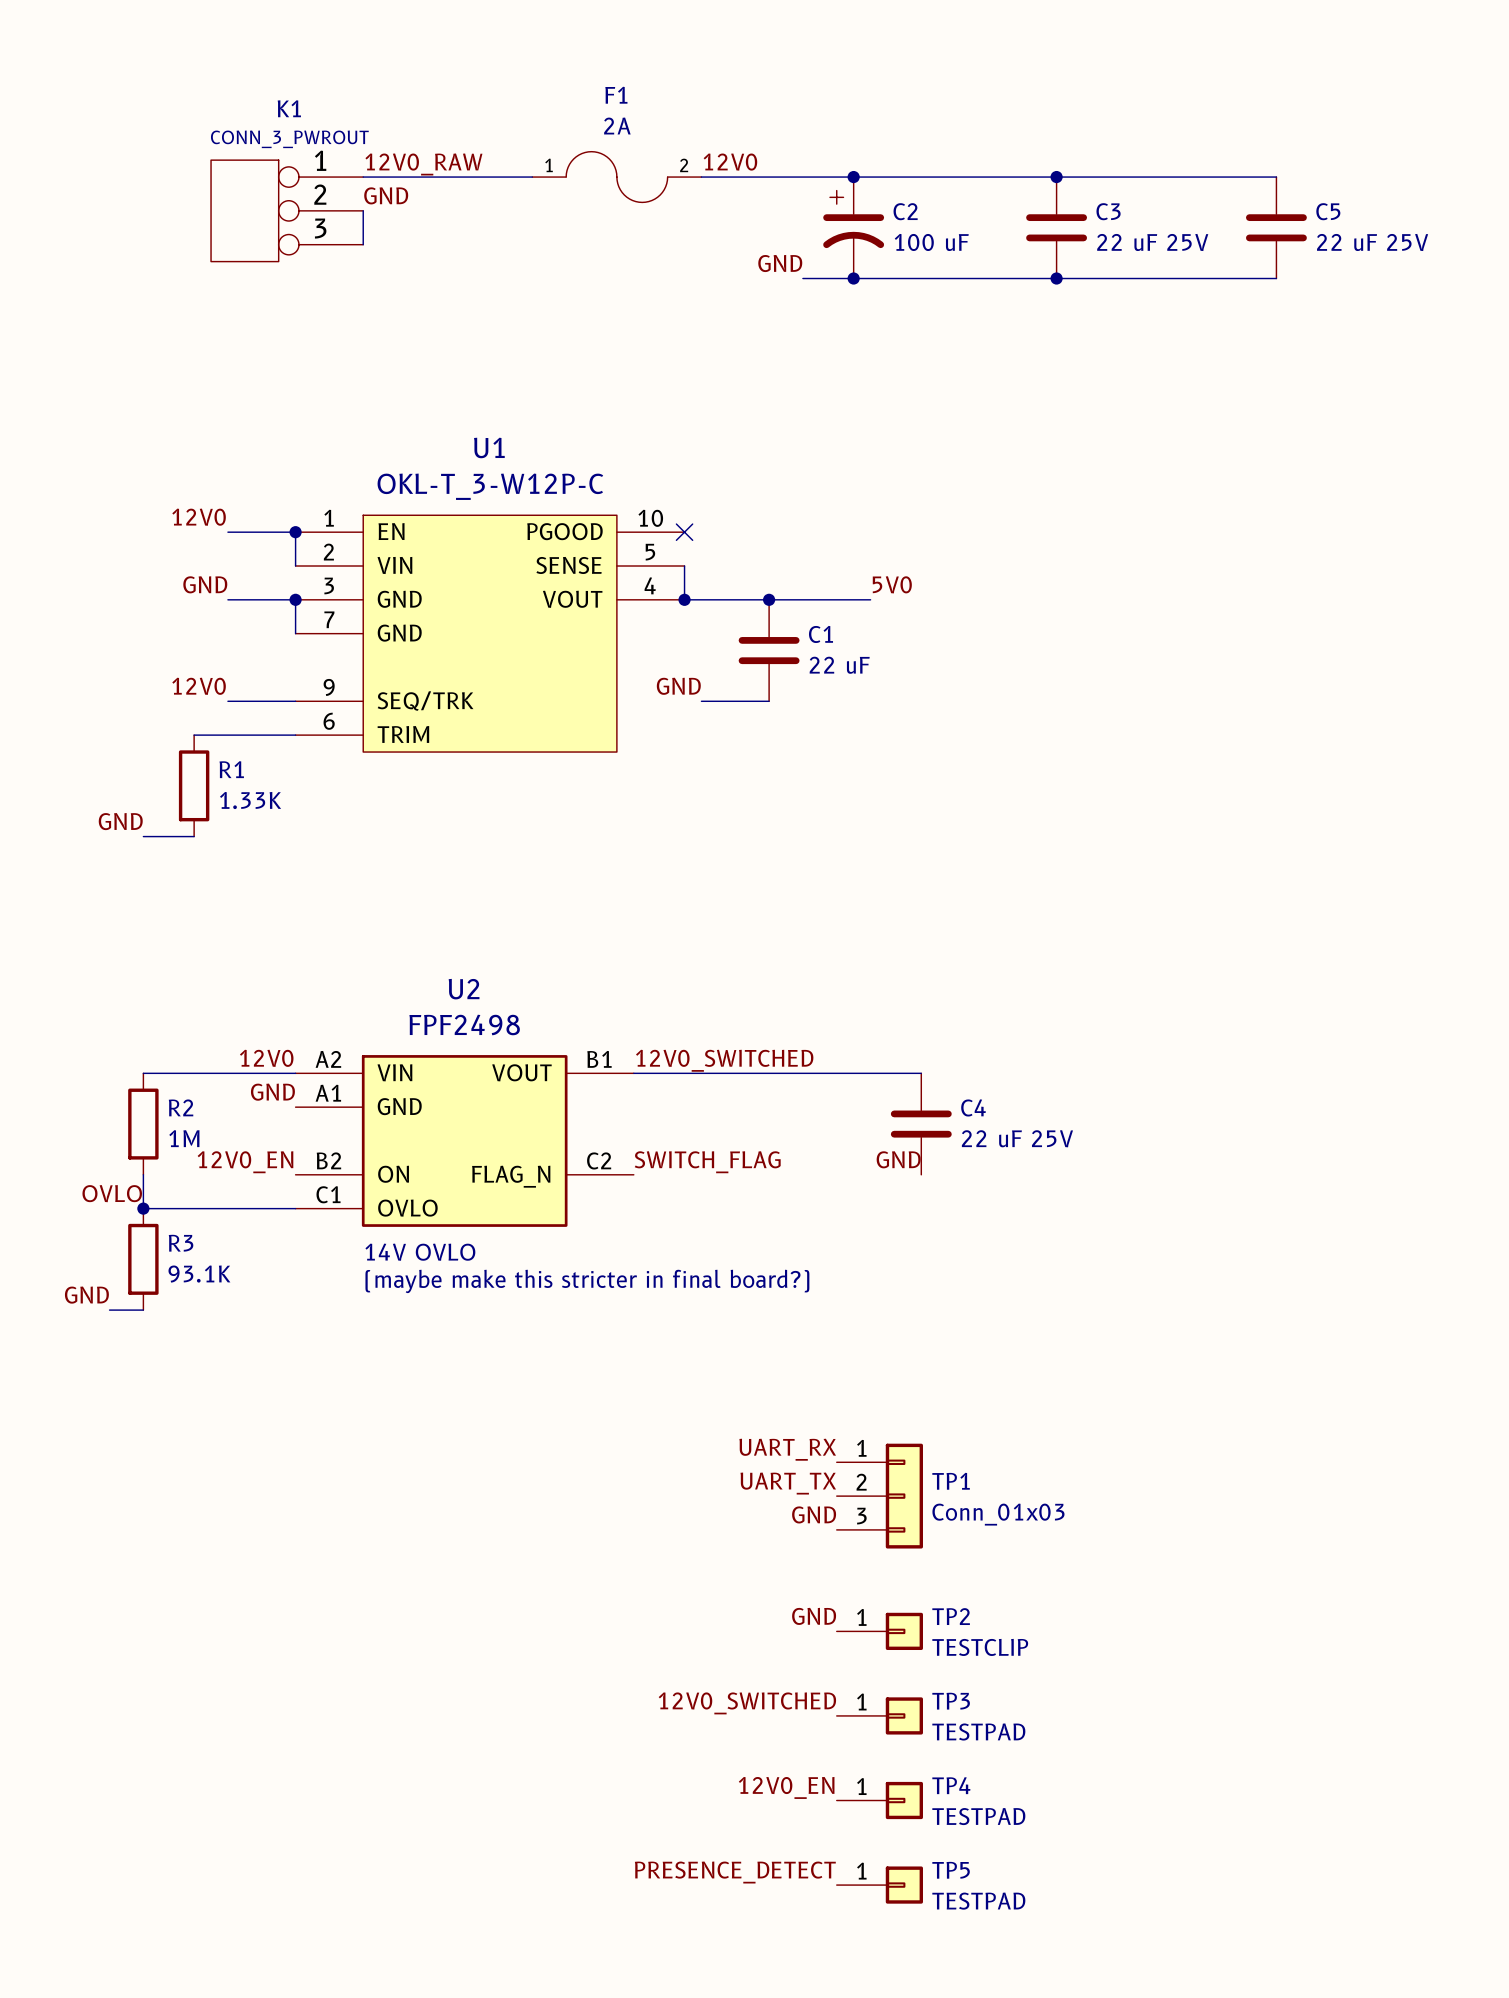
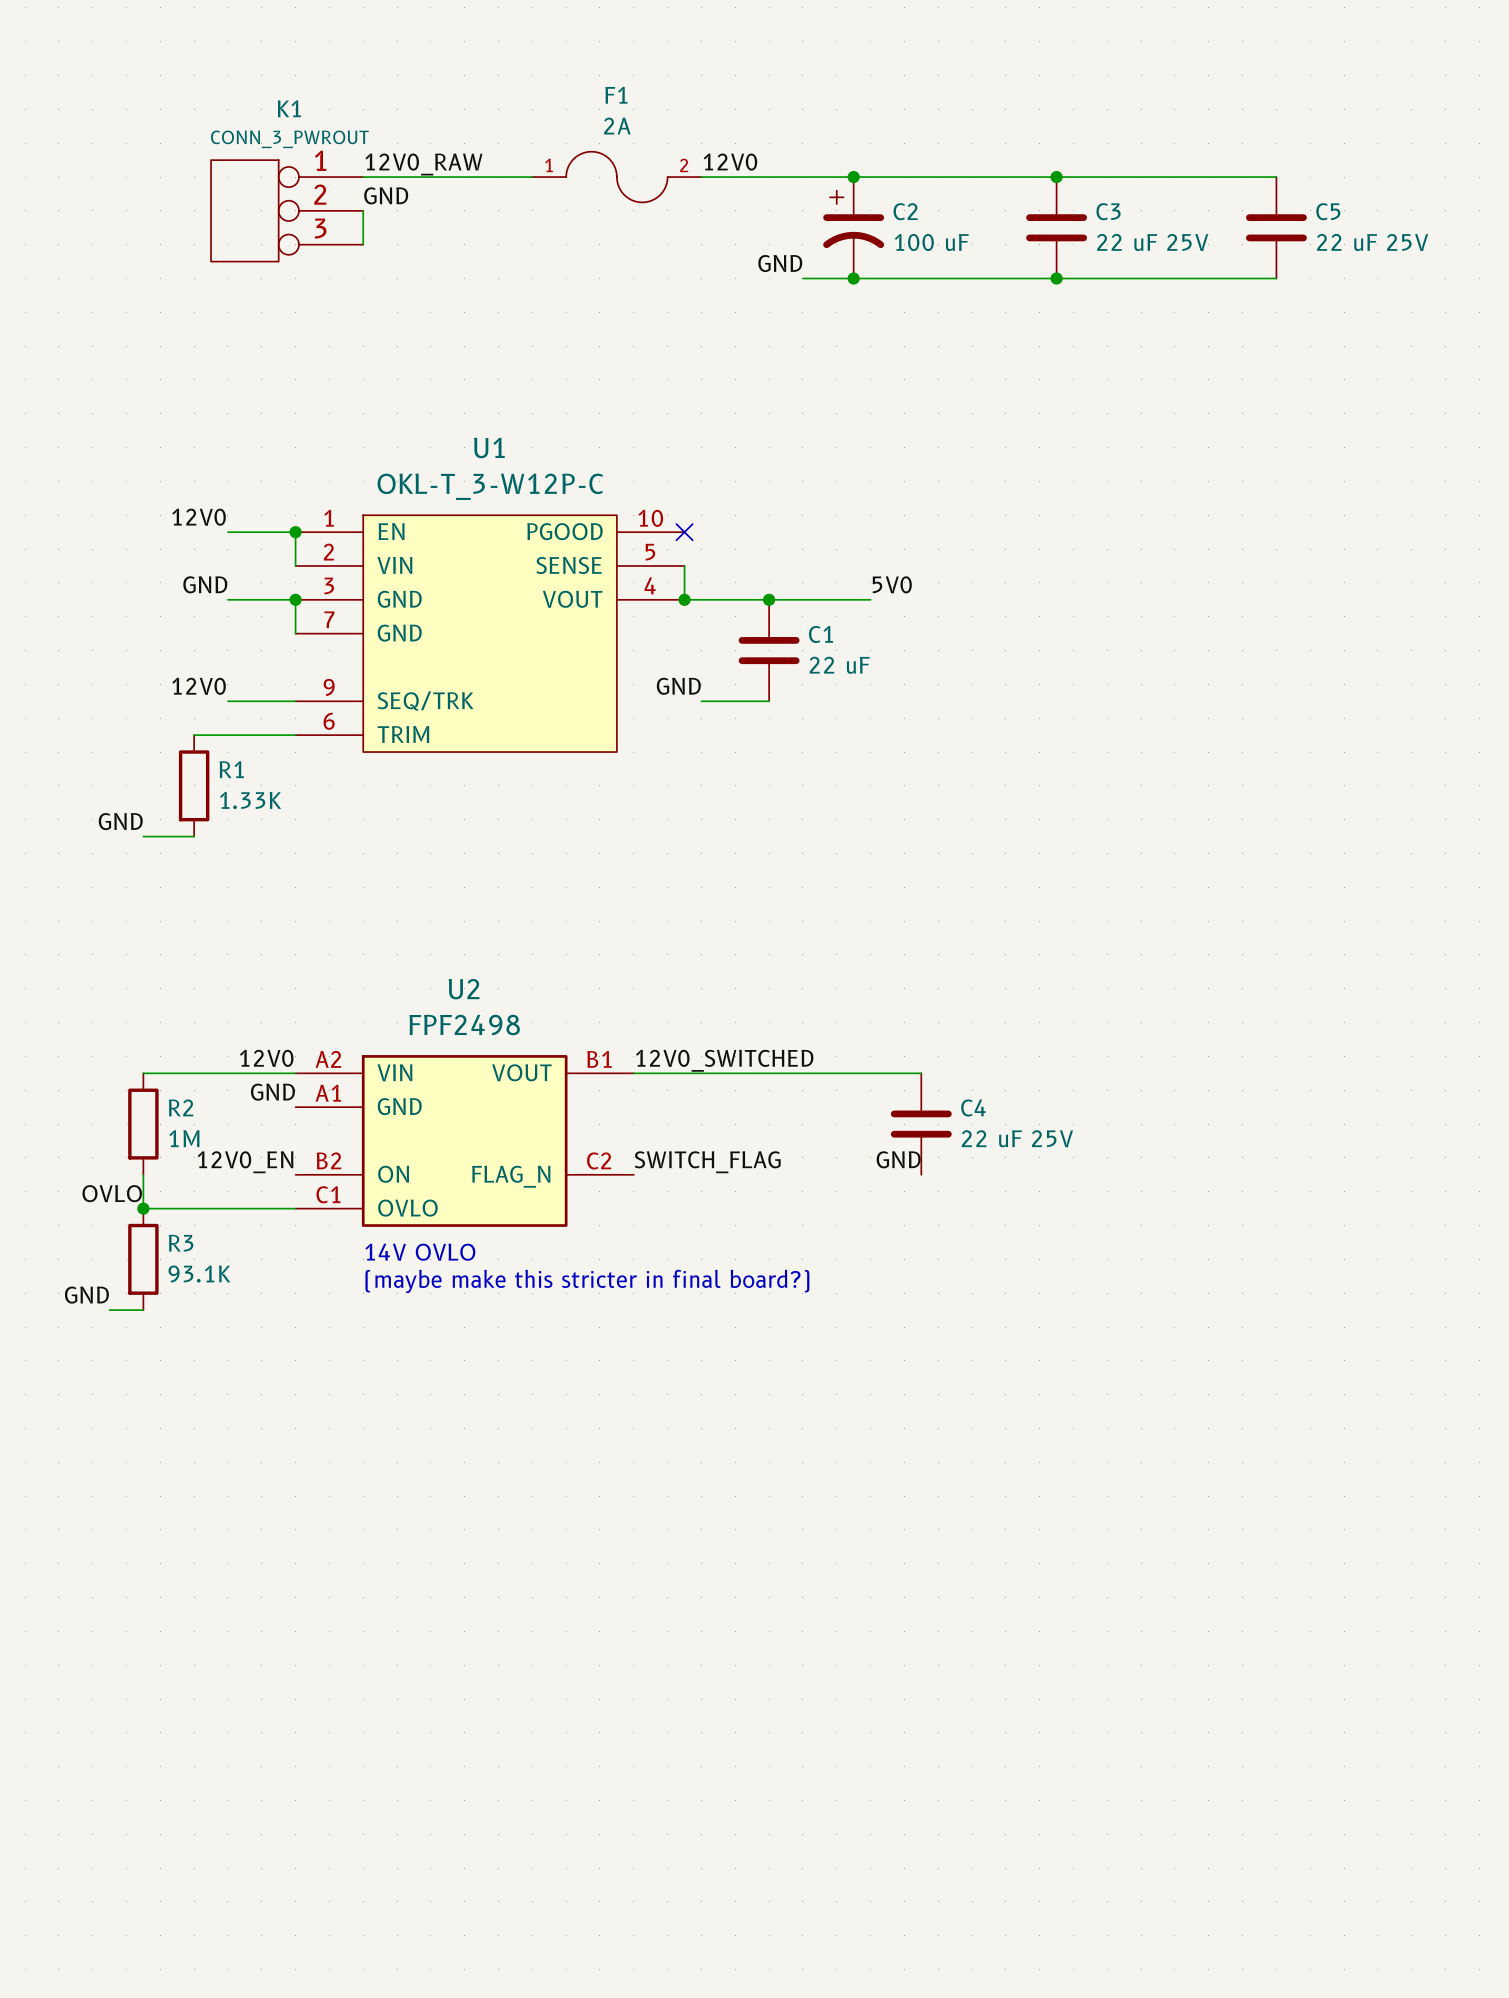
label: UART_RX (787, 1449) -> none
label: UART_TX (788, 1483) -> none
TP1: Conn_01x03 (879, 1496) -> none
label: GND (814, 1514) -> none
label: GND (814, 1616) -> none
TP2: TESTCLIP (879, 1631) -> none
label: 12V0_SWITCHED (747, 1703) -> none
TP3: TESTPAD (879, 1715) -> none
label: 12V0_EN (786, 1787) -> none
TP4: TESTPAD (879, 1800) -> none
label: PRESENCE_DETECT (735, 1872) -> none
TP5: TESTPAD (879, 1885) -> none

